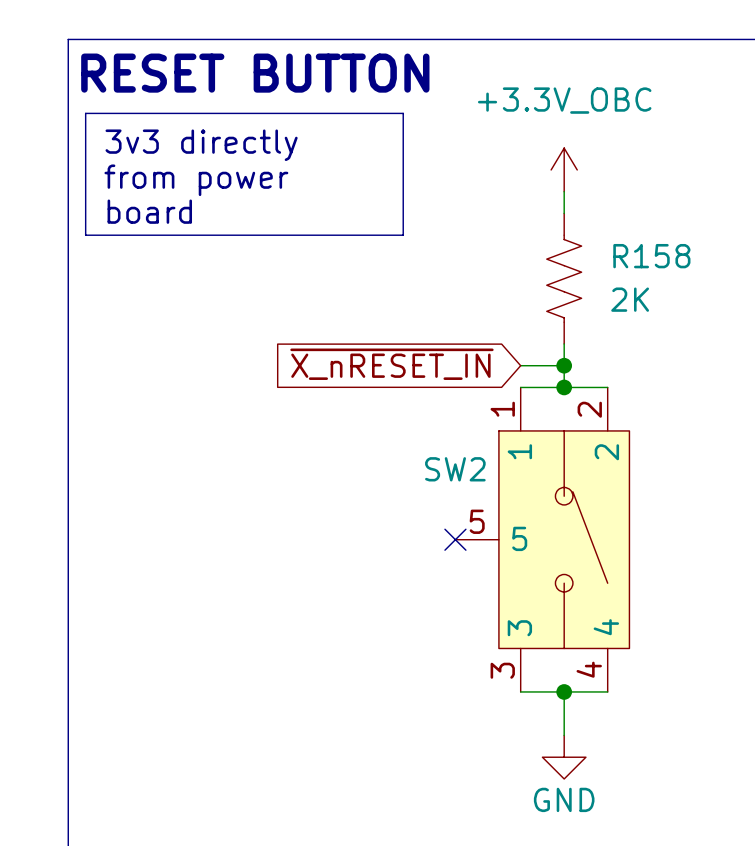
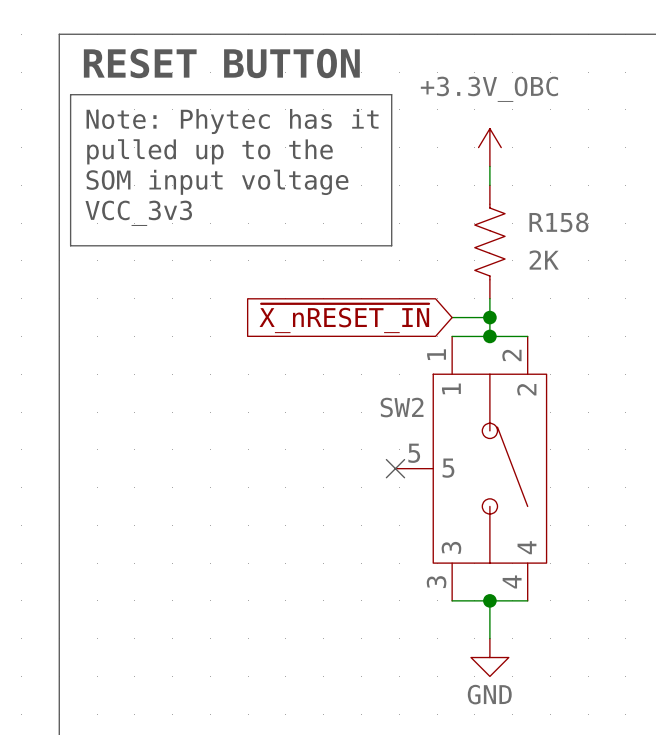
line: (85, 113) (403, 113) (403, 235) (85, 235) (85, 113) -> (70, 94) (70, 245) (391, 245) (391, 94) (70, 94)
text: 3v3 directly (201, 145) -> Note: Phytec has it (232, 121)
text: from power (196, 180) -> pulled up to the (209, 151)
text: board (149, 211) -> SOM input voltage (217, 182)
text: none -> VCC_3v3 (138, 213)

